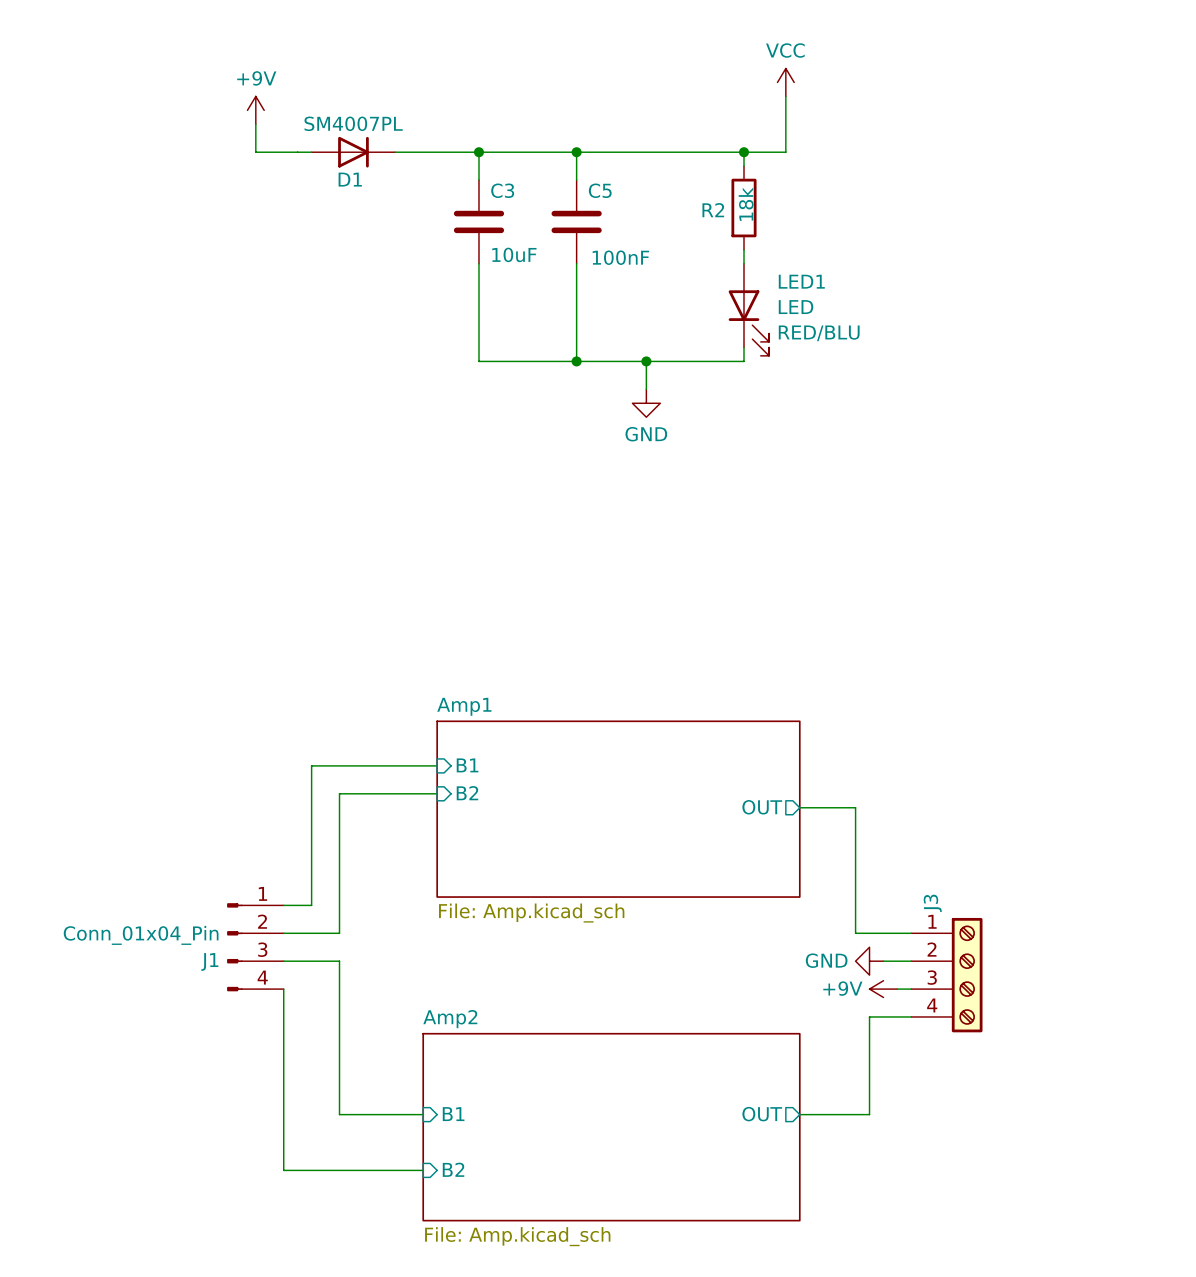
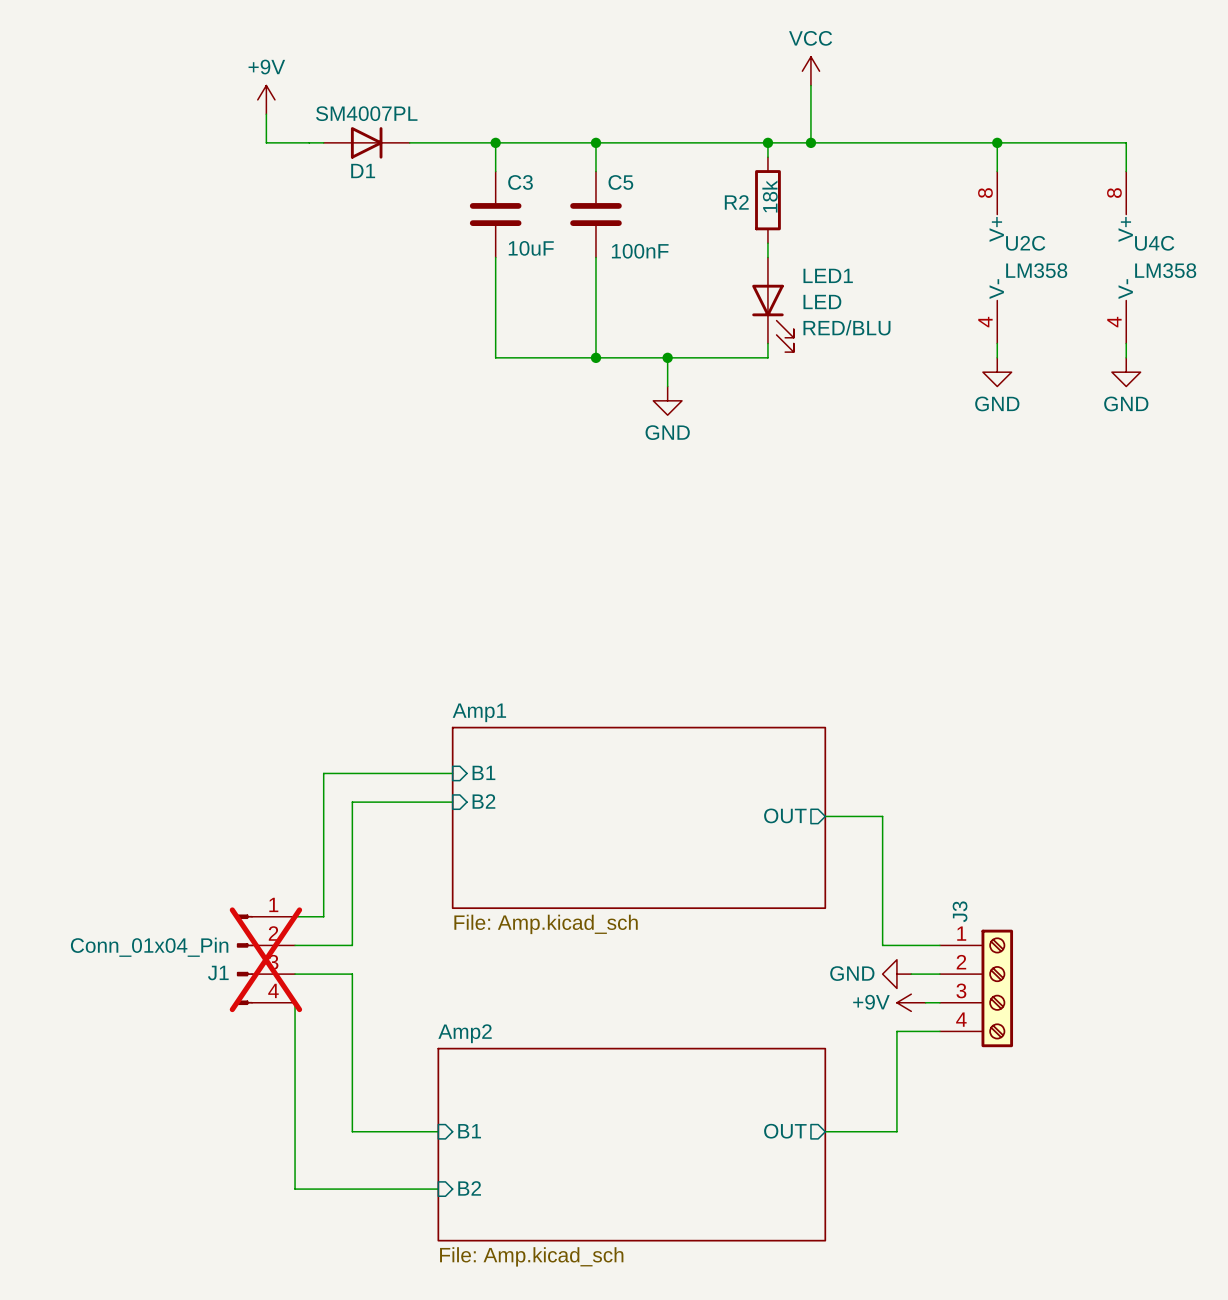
wire: none -> (810, 142) (1126, 142) (1126, 171)
junction: none -> (810, 142)
wire: none -> (997, 142) (997, 171)
junction: none -> (997, 142)
U2C: none -> LM358 (997, 257)
U4C: none -> LM358 (1126, 257)
wire: none -> (997, 343) (997, 357)
wire: none -> (1126, 343) (1126, 357)
power symbol: none -> GND (997, 372)
power symbol: none -> GND (1126, 372)
J1 do-not-place cross: none -> (265, 959)

